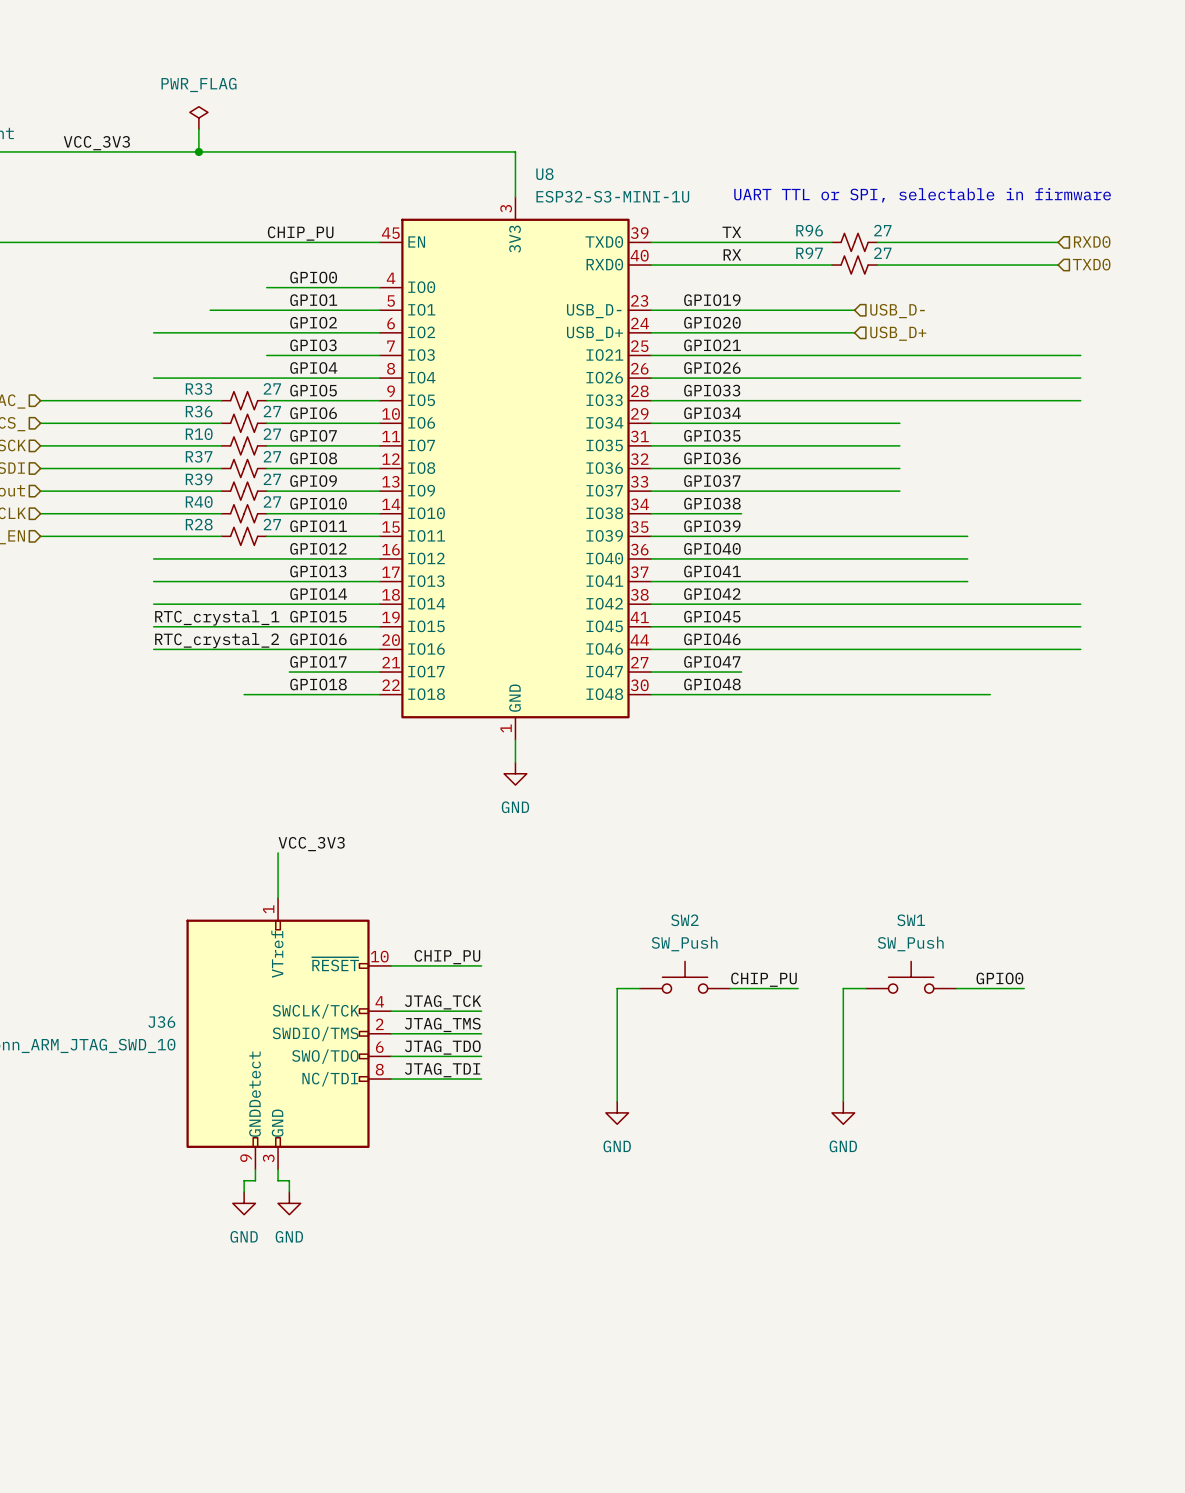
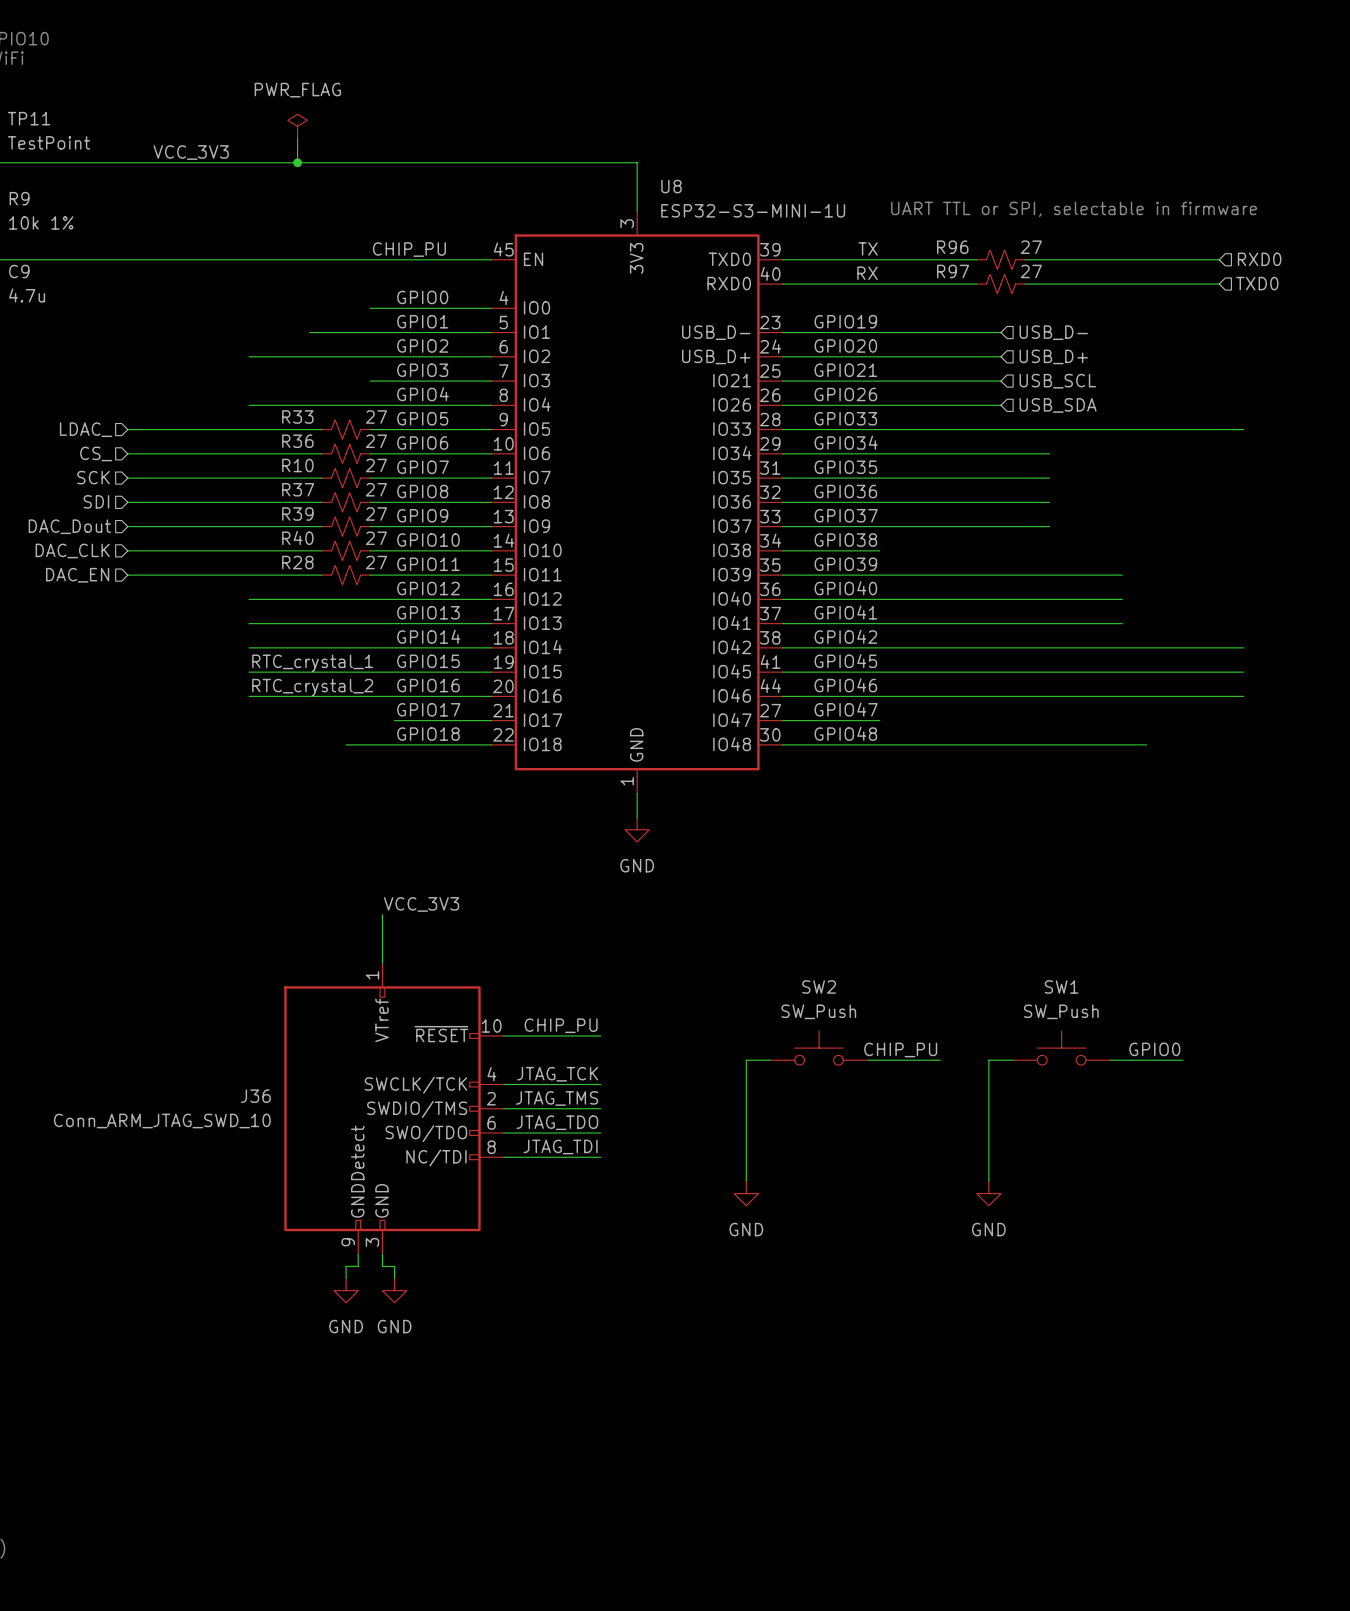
wire: (854, 355) (1080, 355) -> none
hierarchical label: none -> USB_SCL (1057, 381)
wire: (854, 378) (1080, 378) -> none
hierarchical label: none -> USB_SDA (1058, 405)

